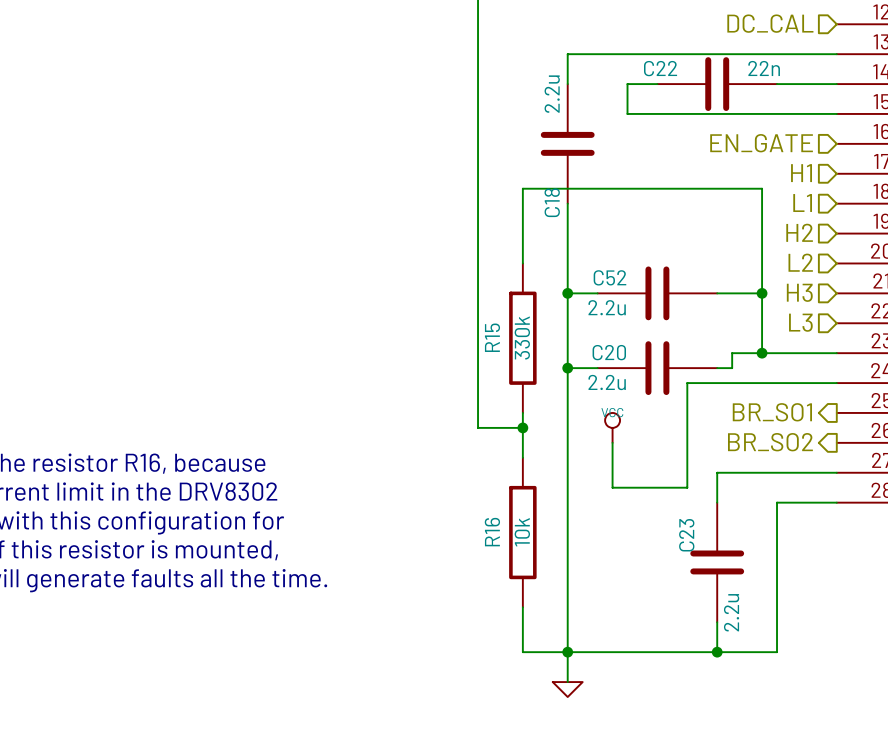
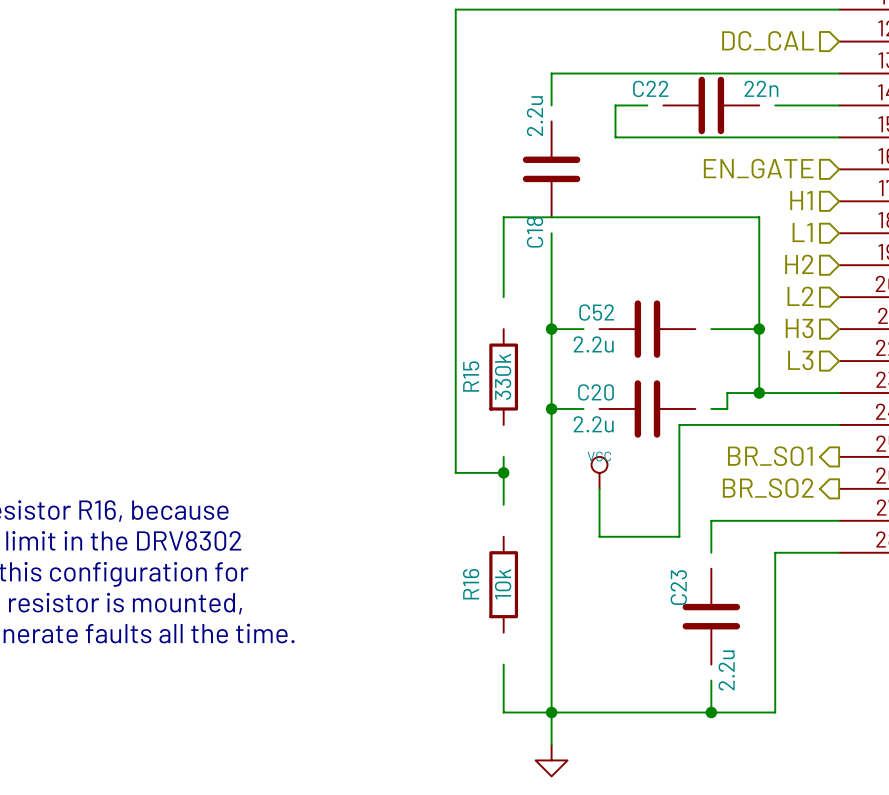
C22 symbol: [657, 57, 778, 111] -> [663, 76, 760, 135]
C18 symbol: [540, 84, 595, 204] -> [522, 121, 581, 218]
R15 symbol: [509, 263, 537, 413] -> [489, 329, 519, 425]
C52 symbol: [597, 266, 718, 321] -> [599, 300, 696, 358]
C20 symbol: [597, 341, 718, 396] -> [599, 380, 696, 438]
R16 symbol: [509, 457, 537, 608] -> [489, 536, 519, 633]
C23 symbol: [690, 502, 745, 623] -> [682, 568, 741, 665]
power symbol shape: [552, 682, 583, 698] -> [535, 744, 568, 777]

